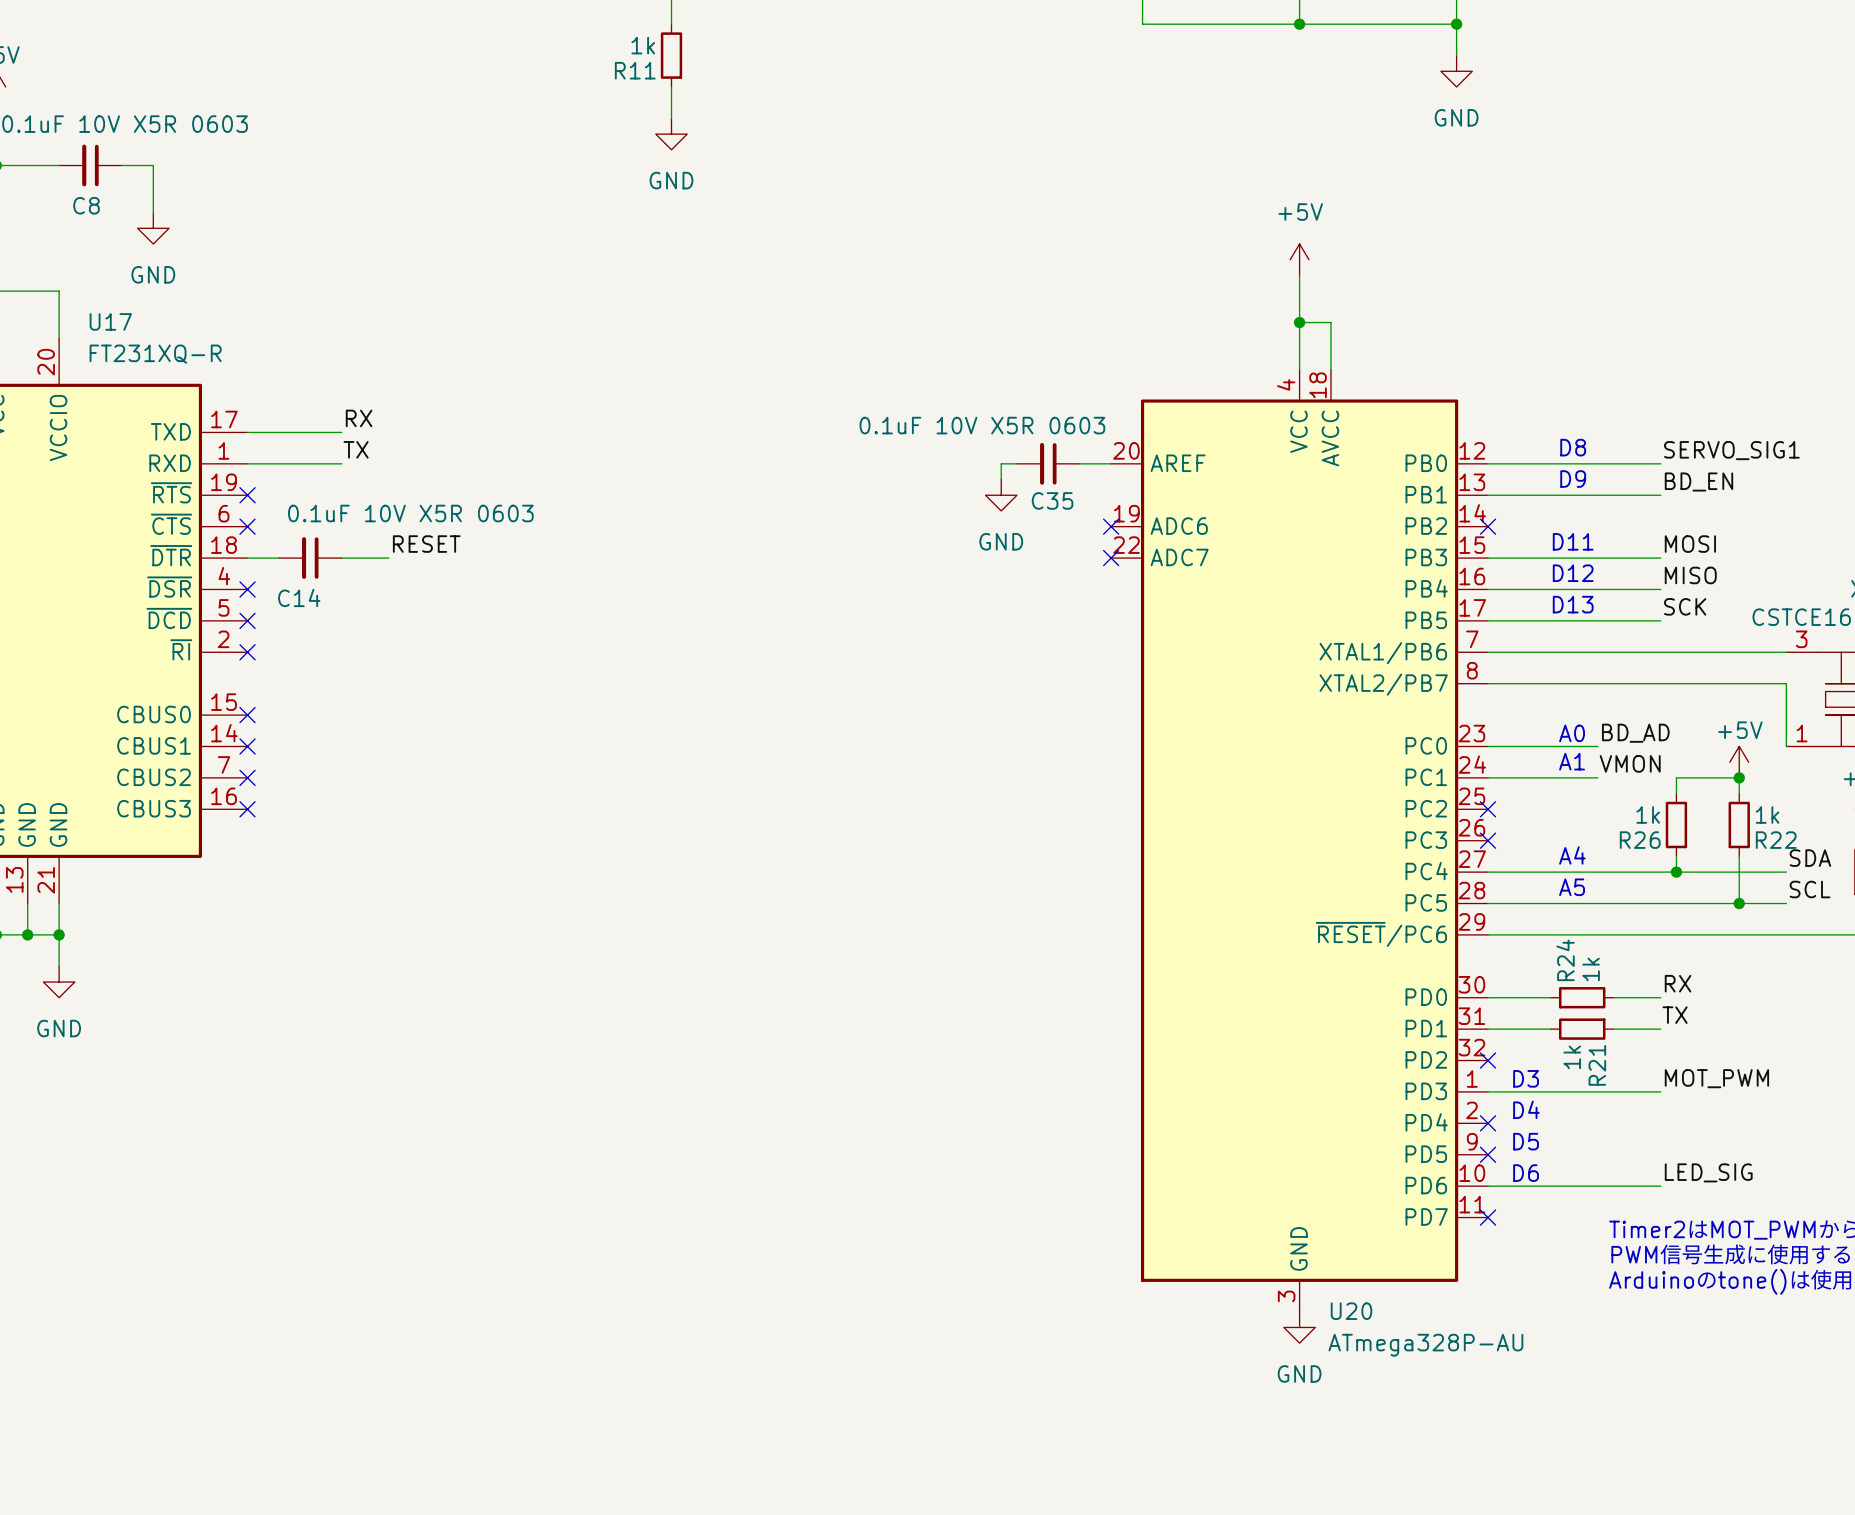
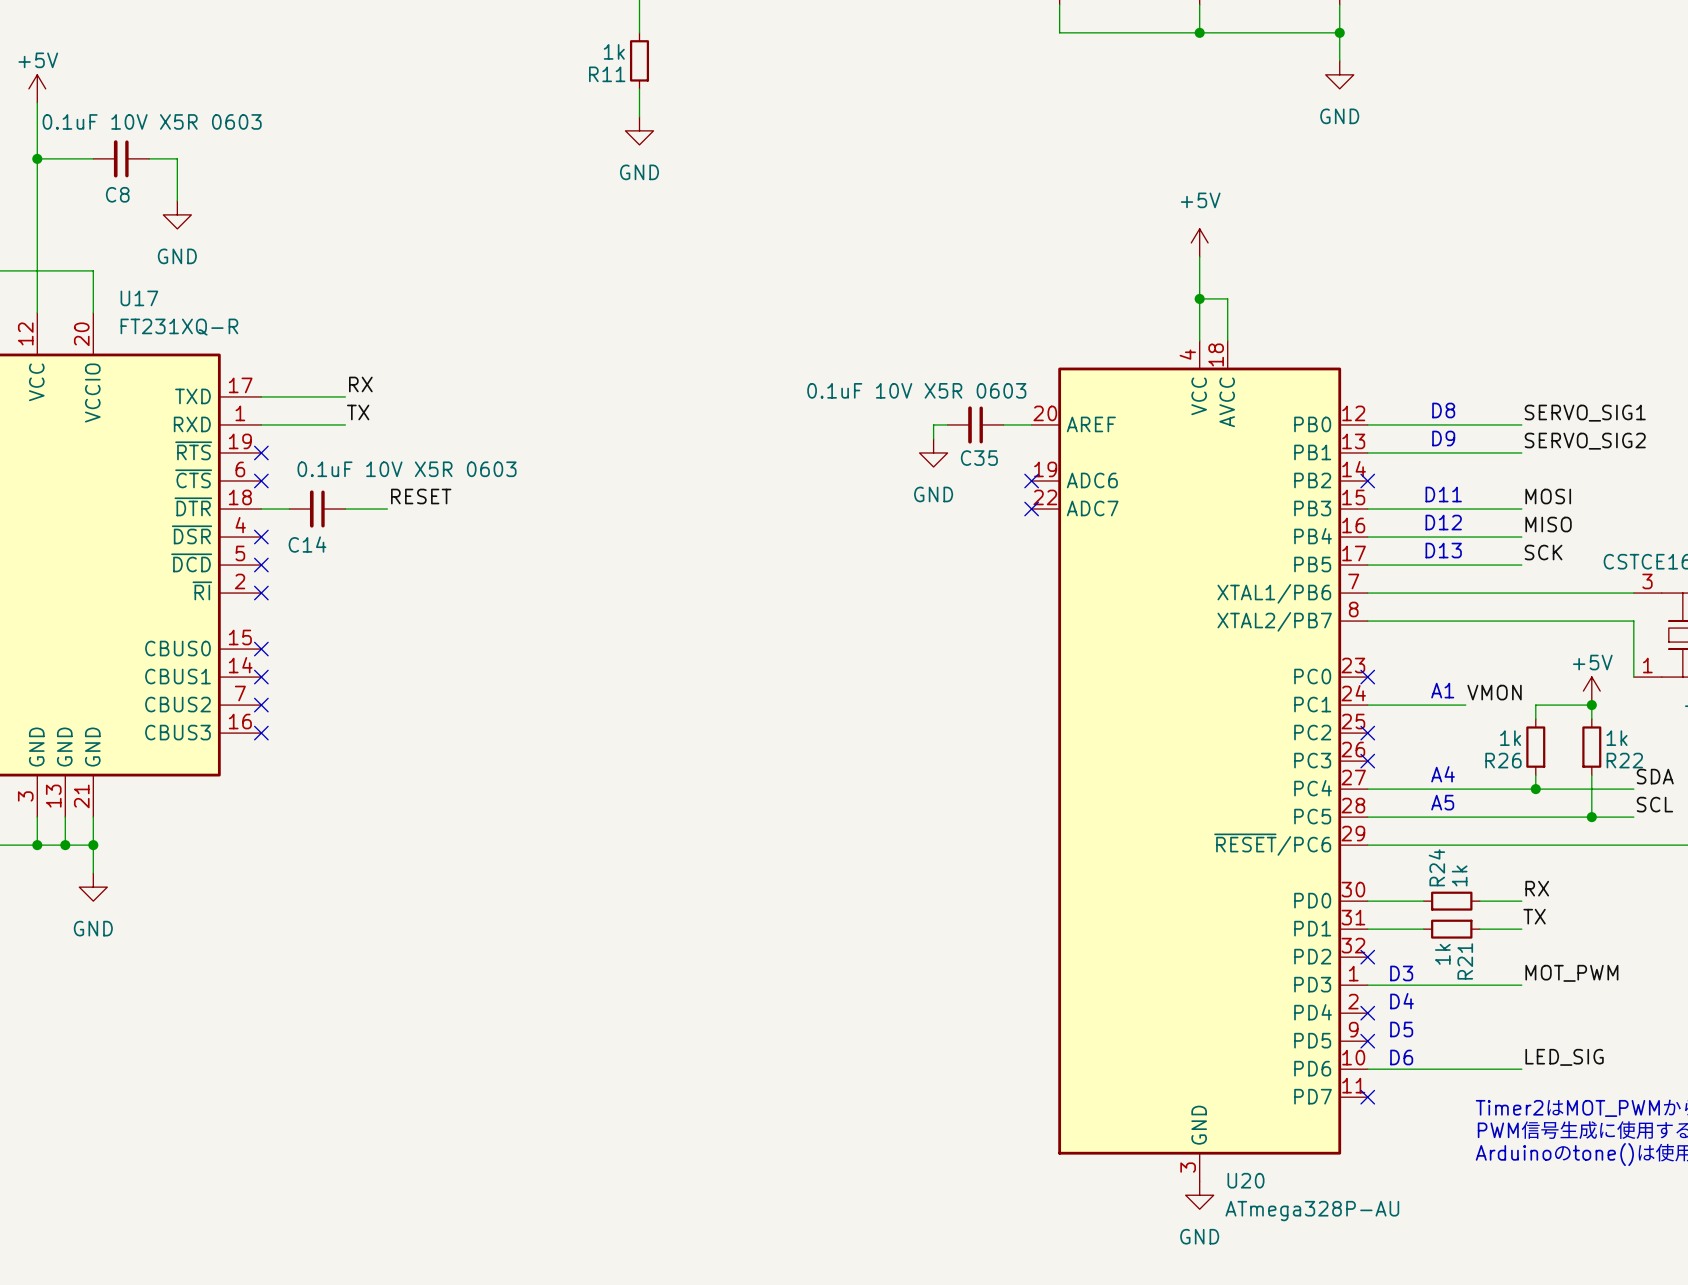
label: BD_EN (1698, 481) -> SERVO_SIG2 (1585, 441)
text: A0 (1572, 733) -> none
label: BD_AD (1635, 733) -> none
wire: (1488, 746) (1597, 746) -> none
no-connect mark: none -> (1367, 677)

